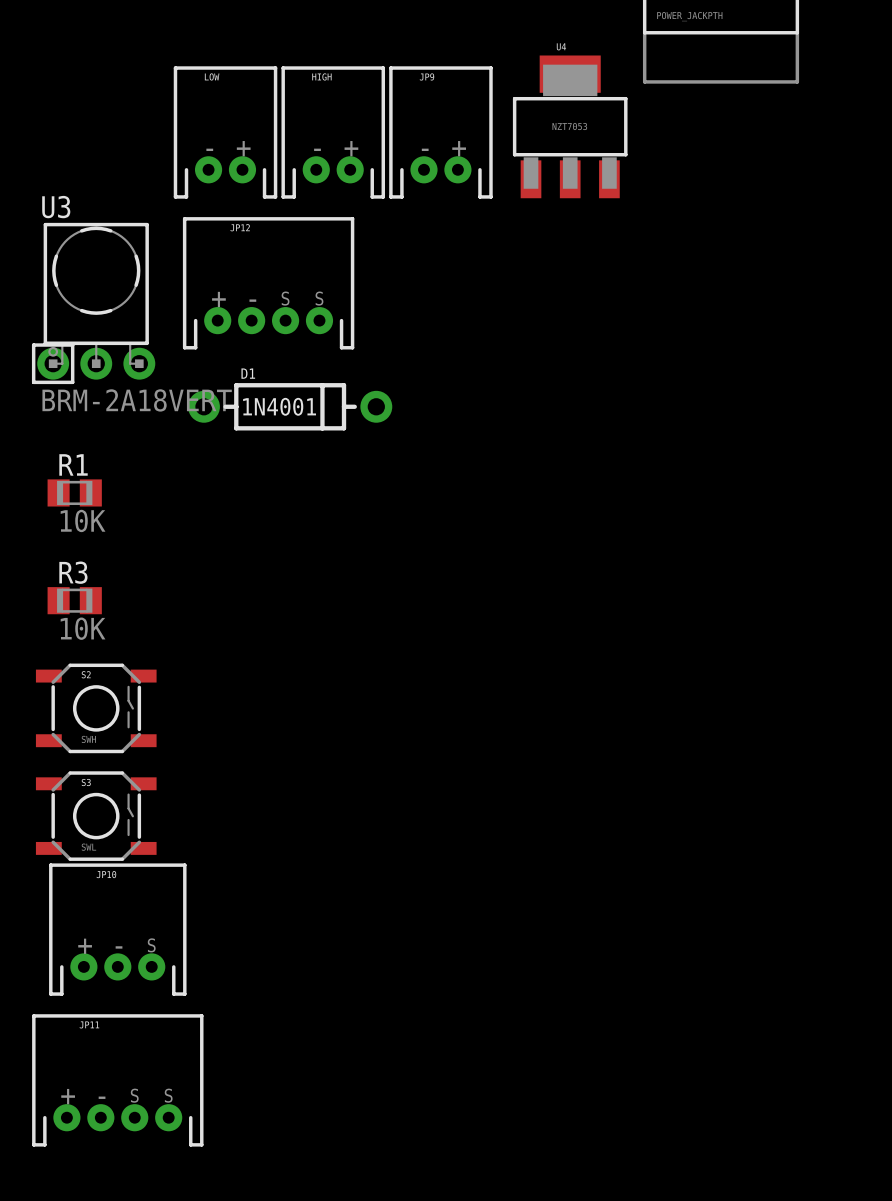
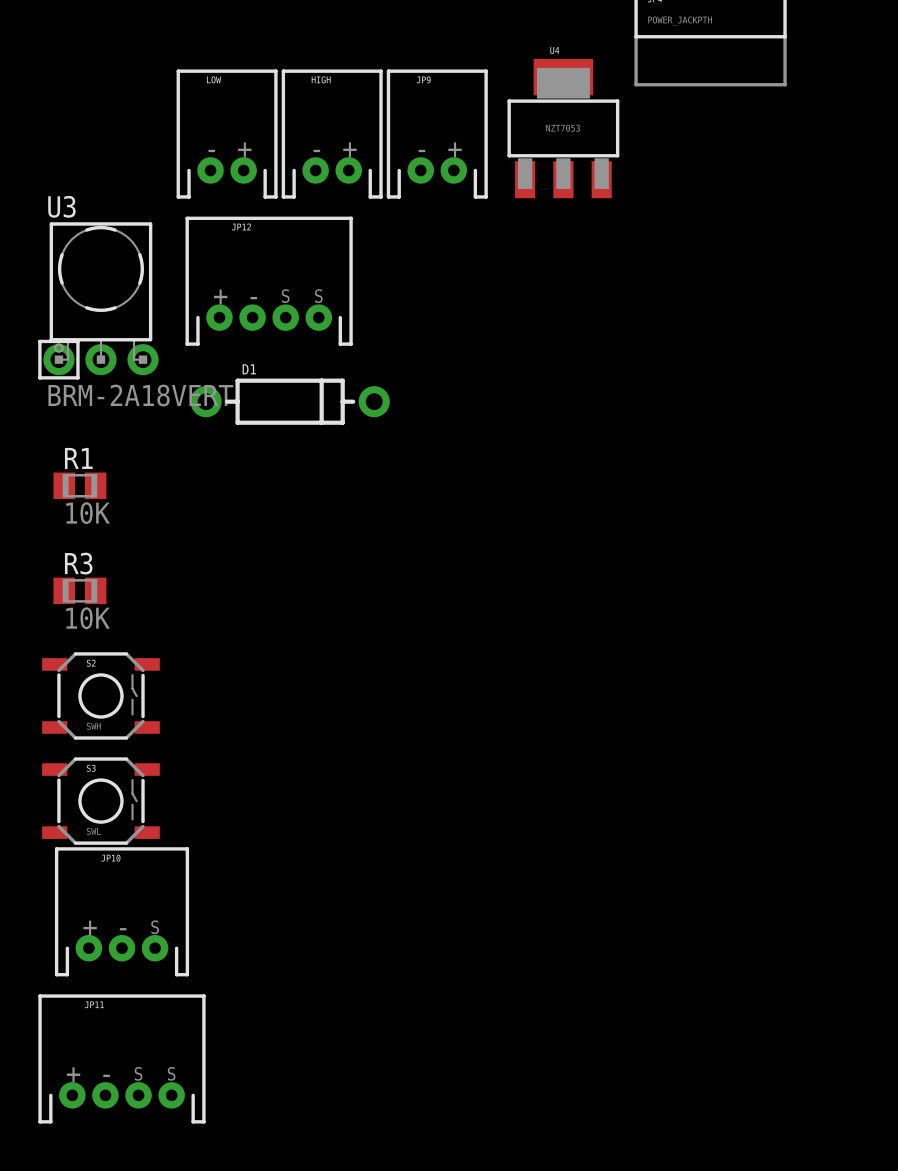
D1 value: 1N4001 (279, 406) -> none

